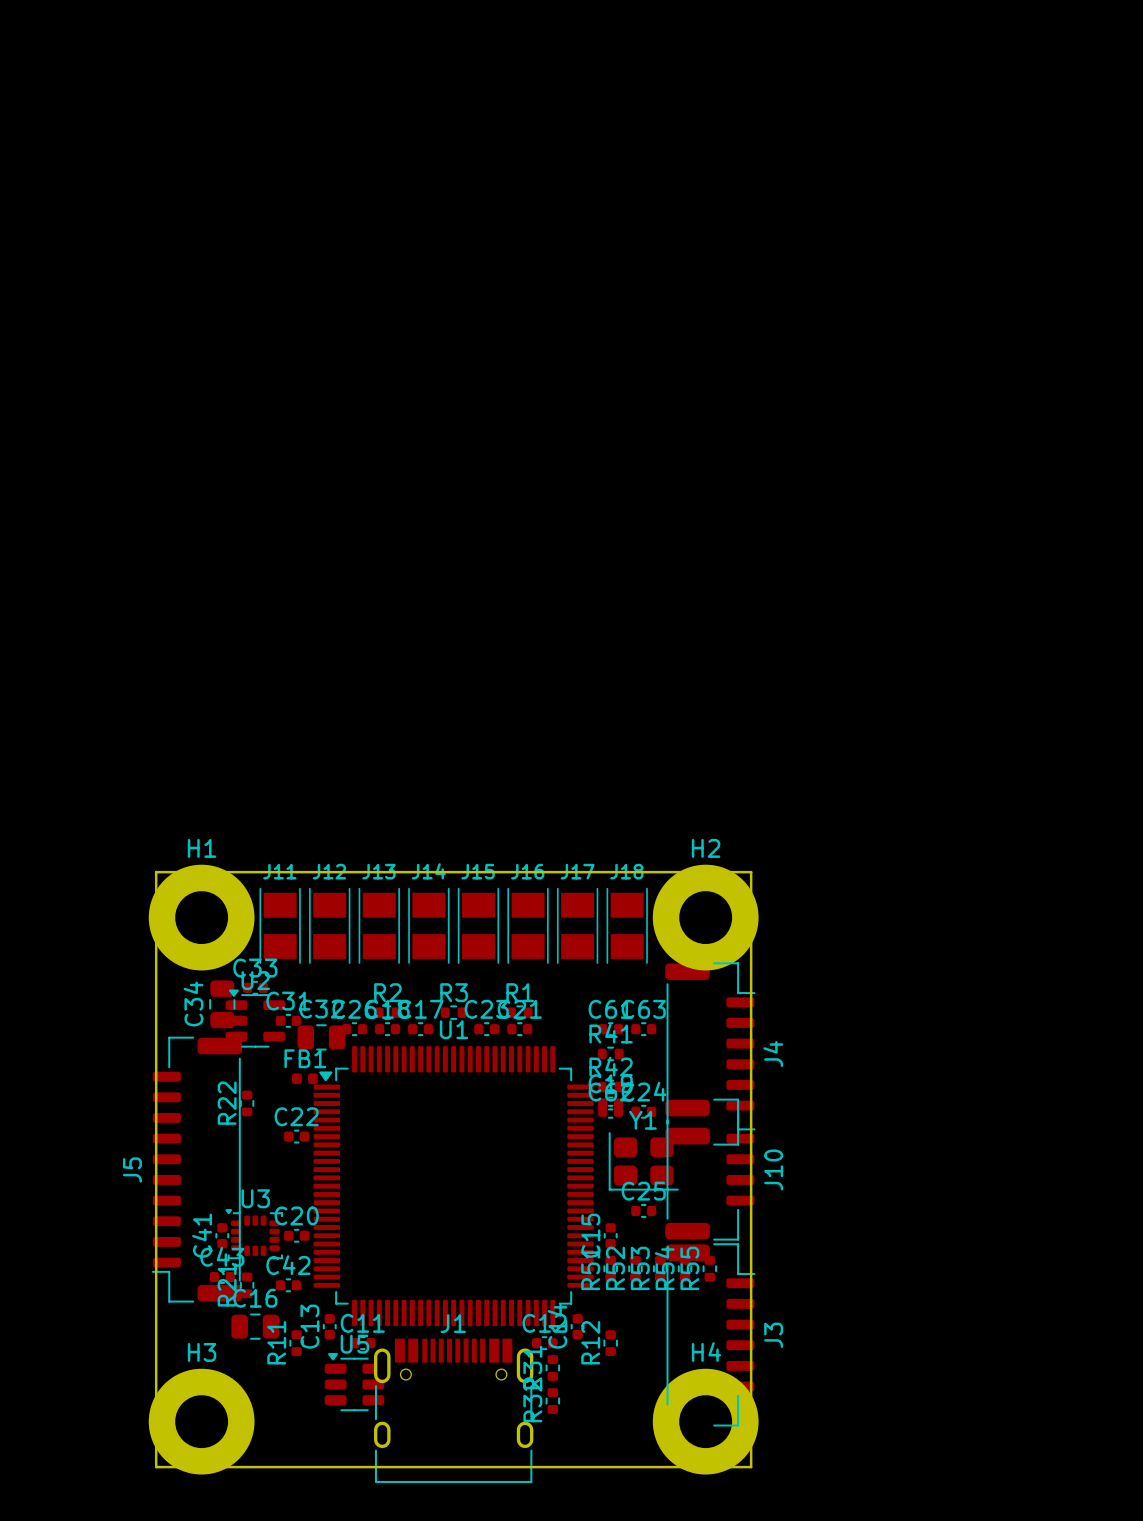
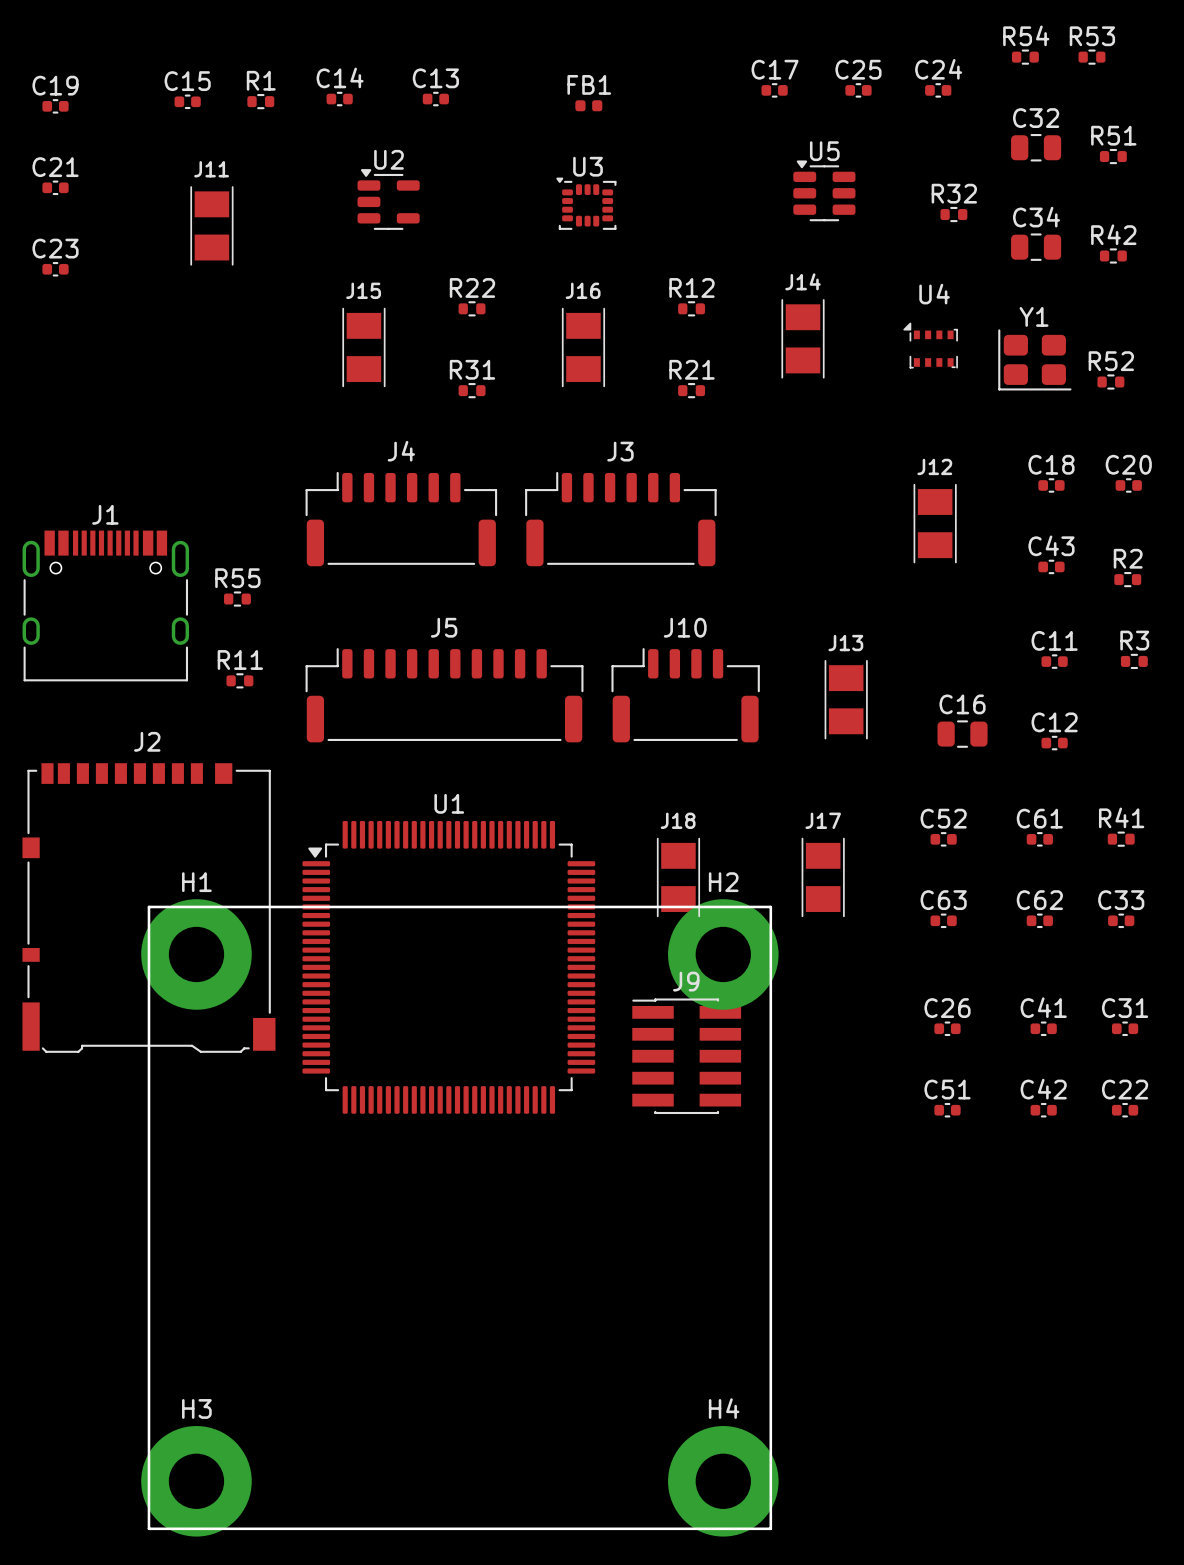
U4: none -> (930, 345)
C52: none -> (943, 839)
J2: none -> (148, 908)
J11 position: (280, 925) -> (211, 225)
J12 position: (329, 925) -> (935, 523)
J13 position: (379, 925) -> (846, 699)
J14 position: (428, 925) -> (803, 338)
J15 position: (478, 925) -> (363, 347)
J16 position: (528, 925) -> (583, 347)
J17 position: (577, 925) -> (823, 877)
J18 position: (627, 925) -> (678, 877)
C33 position: (255, 987) -> (1121, 920)
C34 rotation: 0° (222, 1004) -> 90° clockwise (1036, 247)
C34 position: (222, 1004) -> (1036, 247)
R2 position: (387, 1012) -> (1127, 579)
R3 position: (453, 1012) -> (1134, 661)
R1 position: (519, 1012) -> (260, 101)
J9: none -> (686, 1056)
U2 position: (255, 1018) -> (388, 199)
C31 position: (288, 1020) -> (1125, 1028)
C26 position: (354, 1029) -> (947, 1028)
C18 position: (387, 1029) -> (1051, 485)
C17 position: (420, 1029) -> (774, 90)
C23 position: (486, 1029) -> (55, 269)
C21 position: (519, 1029) -> (55, 187)
C61 position: (610, 1029) -> (1039, 839)
C63 position: (643, 1029) -> (943, 920)
C32 position: (321, 1037) -> (1036, 147)
R41 position: (610, 1053) -> (1121, 839)
J4 rotation: 0° (710, 1053) -> 90° counterclockwise (401, 519)
J4 position: (710, 1053) -> (401, 519)
C51: none -> (947, 1110)
FB1 position: (304, 1078) -> (588, 105)
R42 position: (610, 1086) -> (1113, 255)
R22 rotation: 0° (247, 1103) -> 90° clockwise (472, 308)
R22 position: (247, 1103) -> (472, 308)
C19 position: (610, 1103) -> (55, 106)
C62 position: (610, 1111) -> (1039, 920)
C24 position: (643, 1111) -> (938, 90)
C22 position: (296, 1136) -> (1125, 1110)
Y1 position: (643, 1161) -> (1034, 359)
J5 rotation: 0° (197, 1169) -> 90° clockwise (444, 695)
J5 position: (197, 1169) -> (444, 695)
J10 rotation: 0° (710, 1169) -> 90° counterclockwise (685, 695)
J10 position: (710, 1169) -> (685, 695)
U1 position: (453, 1186) -> (448, 967)
C25 position: (643, 1210) -> (858, 90)
U3 position: (254, 1234) -> (586, 203)
C41 rotation: 0° (222, 1235) -> 90° clockwise (1043, 1028)
C41 position: (222, 1235) -> (1043, 1028)
C20 position: (296, 1235) -> (1128, 485)
C15 rotation: 0° (610, 1235) -> 90° clockwise (187, 101)
C15 position: (610, 1235) -> (187, 101)
R51 rotation: 0° (610, 1268) -> 90° clockwise (1113, 156)
R51 position: (610, 1268) -> (1113, 156)
R52 rotation: 0° (635, 1268) -> 90° clockwise (1110, 382)
R52 position: (635, 1268) -> (1110, 382)
R53 rotation: 0° (660, 1268) -> 90° clockwise (1091, 57)
R53 position: (660, 1268) -> (1091, 57)
R54 rotation: 0° (685, 1268) -> 90° clockwise (1025, 57)
R54 position: (685, 1268) -> (1025, 57)
R55 rotation: 0° (709, 1268) -> 90° clockwise (237, 599)
R55 position: (709, 1268) -> (237, 599)
C43 position: (222, 1277) -> (1051, 566)
R21 rotation: 0° (247, 1285) -> 90° clockwise (691, 390)
R21 position: (247, 1285) -> (691, 390)
C42 position: (288, 1285) -> (1043, 1110)
C16 position: (255, 1326) -> (962, 734)
C13 rotation: 0° (329, 1326) -> 90° clockwise (435, 99)
C13 position: (329, 1326) -> (435, 99)
C14 rotation: 0° (577, 1326) -> 90° clockwise (339, 99)
C14 position: (577, 1326) -> (339, 99)
J3 rotation: 0° (710, 1334) -> 90° counterclockwise (620, 519)
J3 position: (710, 1334) -> (620, 519)
R11 rotation: 0° (296, 1343) -> 90° clockwise (239, 680)
R11 position: (296, 1343) -> (239, 680)
C11 position: (362, 1343) -> (1054, 661)
C12 position: (544, 1343) -> (1054, 743)
R12 rotation: 0° (610, 1343) -> 90° clockwise (691, 308)
R12 position: (610, 1343) -> (691, 308)
R31 rotation: 0° (552, 1367) -> 90° clockwise (472, 390)
R31 position: (552, 1367) -> (472, 390)
U5 position: (354, 1382) -> (824, 190)
R32 rotation: 0° (552, 1400) -> 90° clockwise (953, 214)
R32 position: (552, 1400) -> (953, 214)
J1 position: (453, 1410) -> (105, 605)

